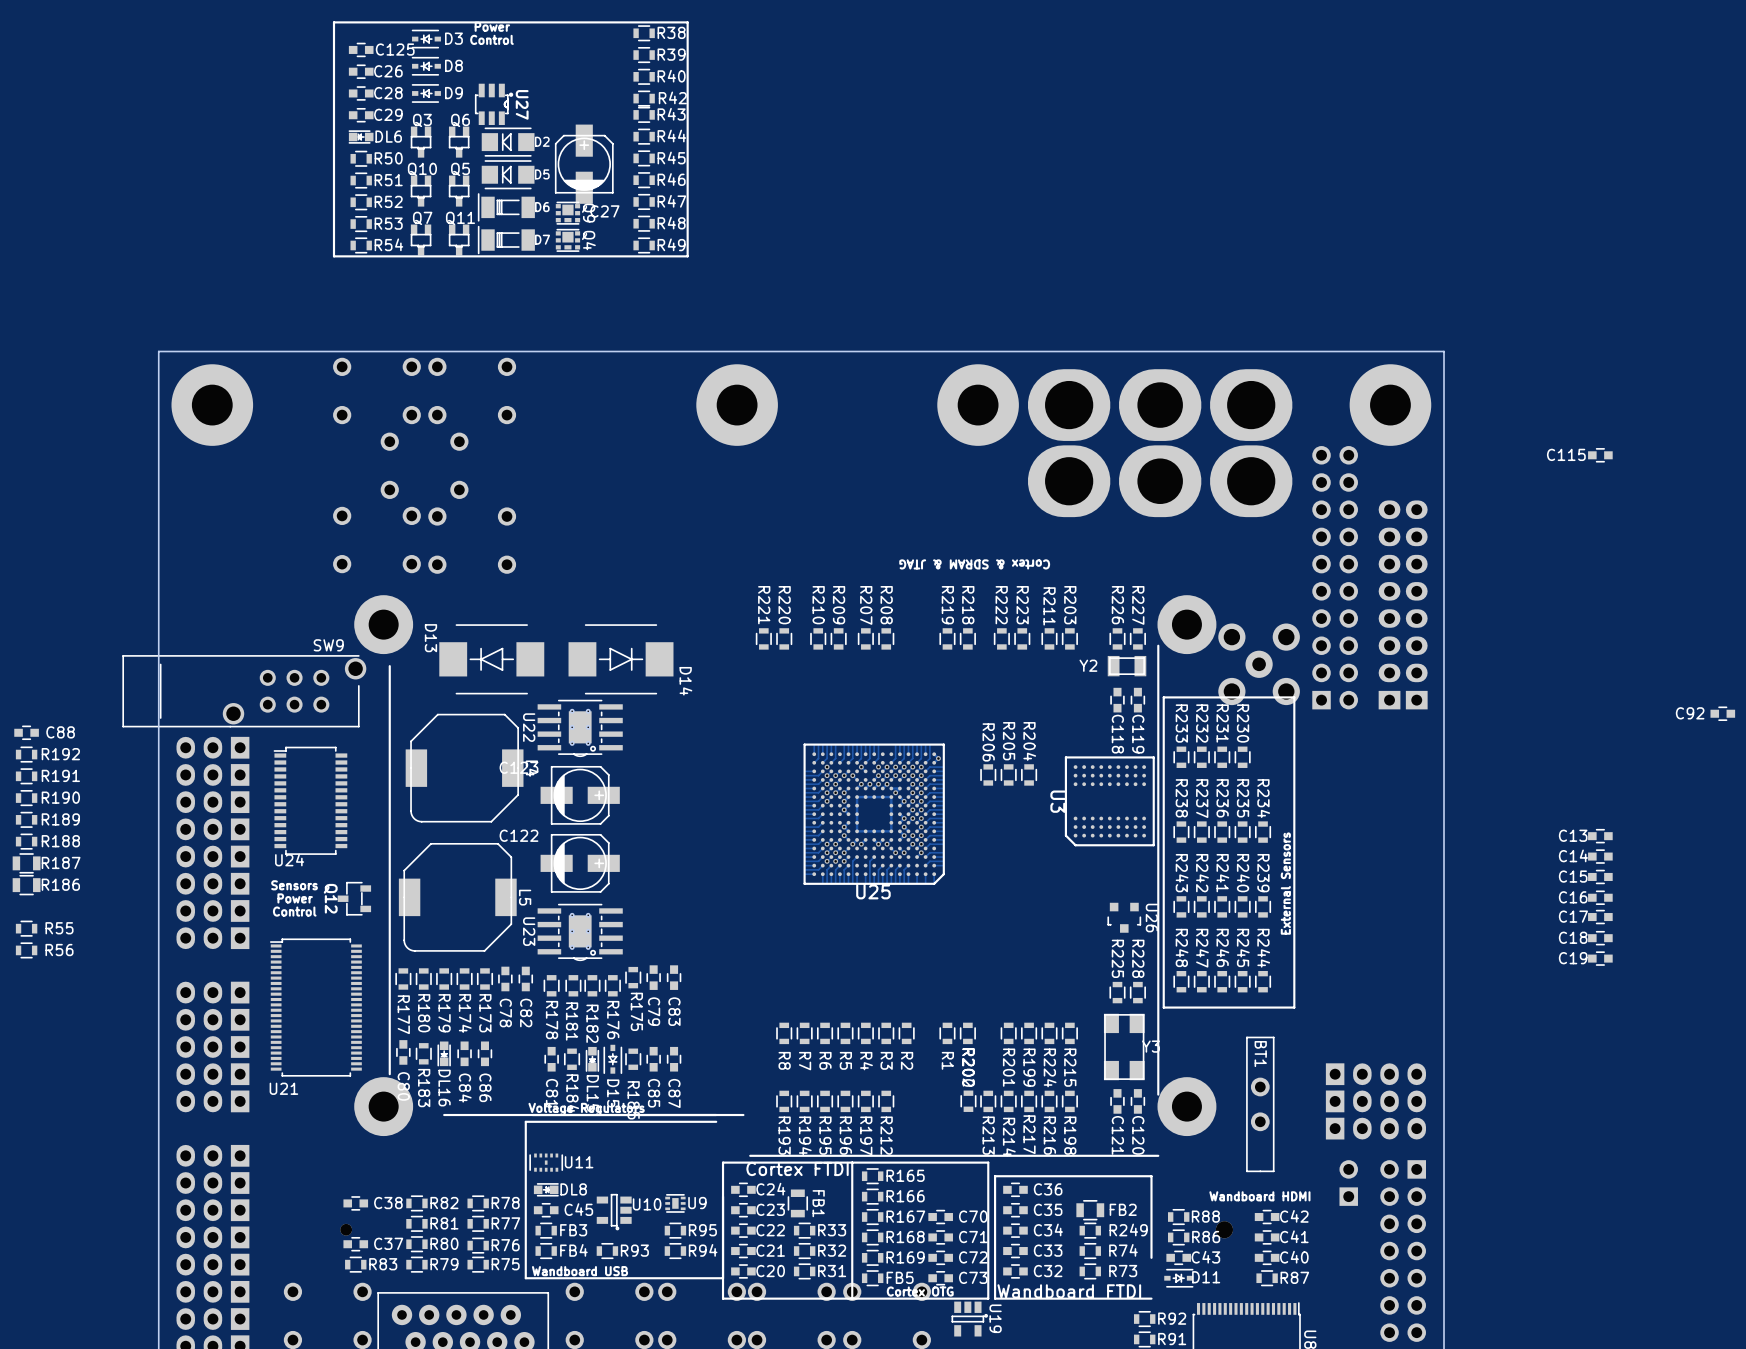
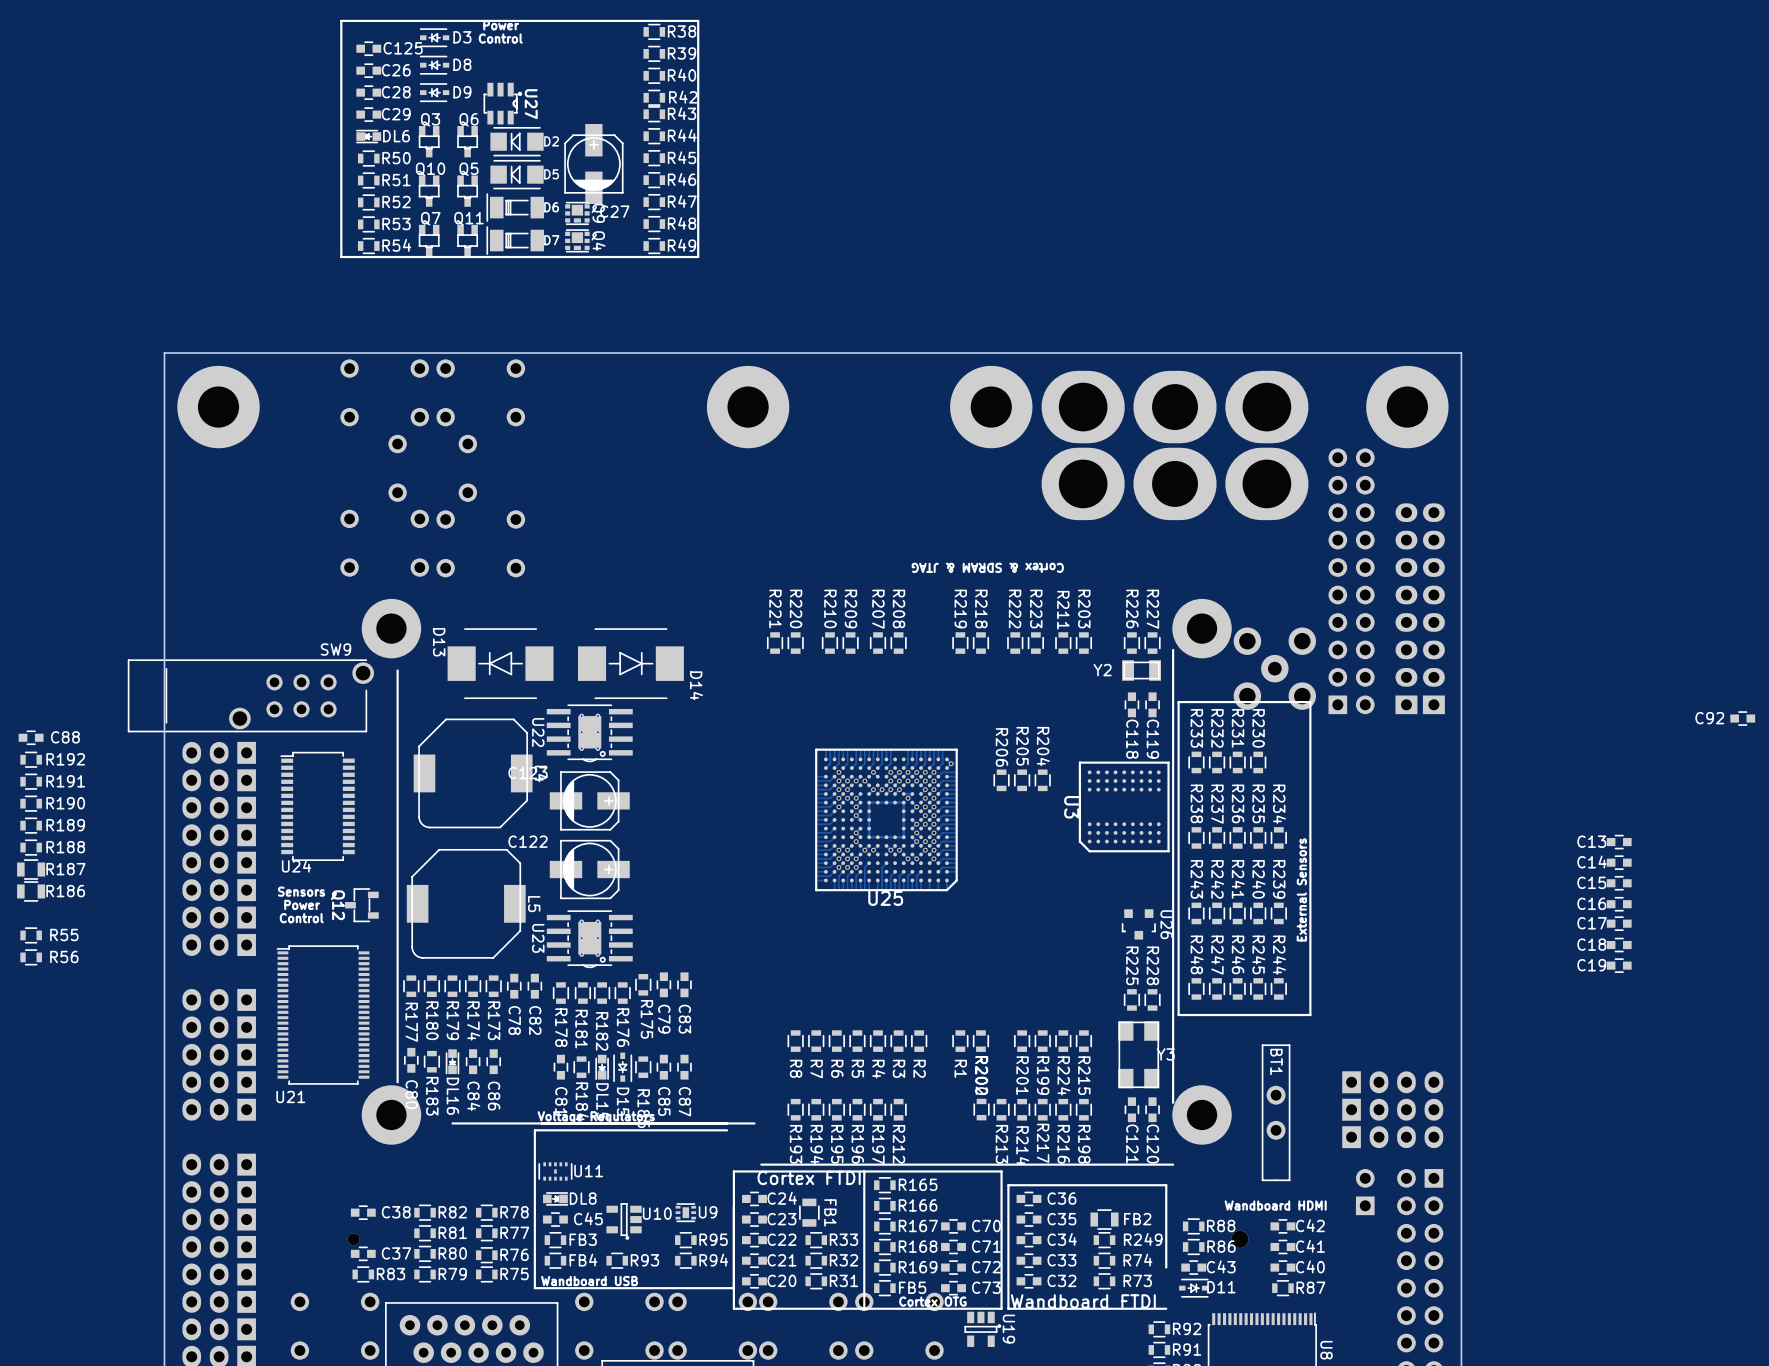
C115: (1600, 455) -> none

